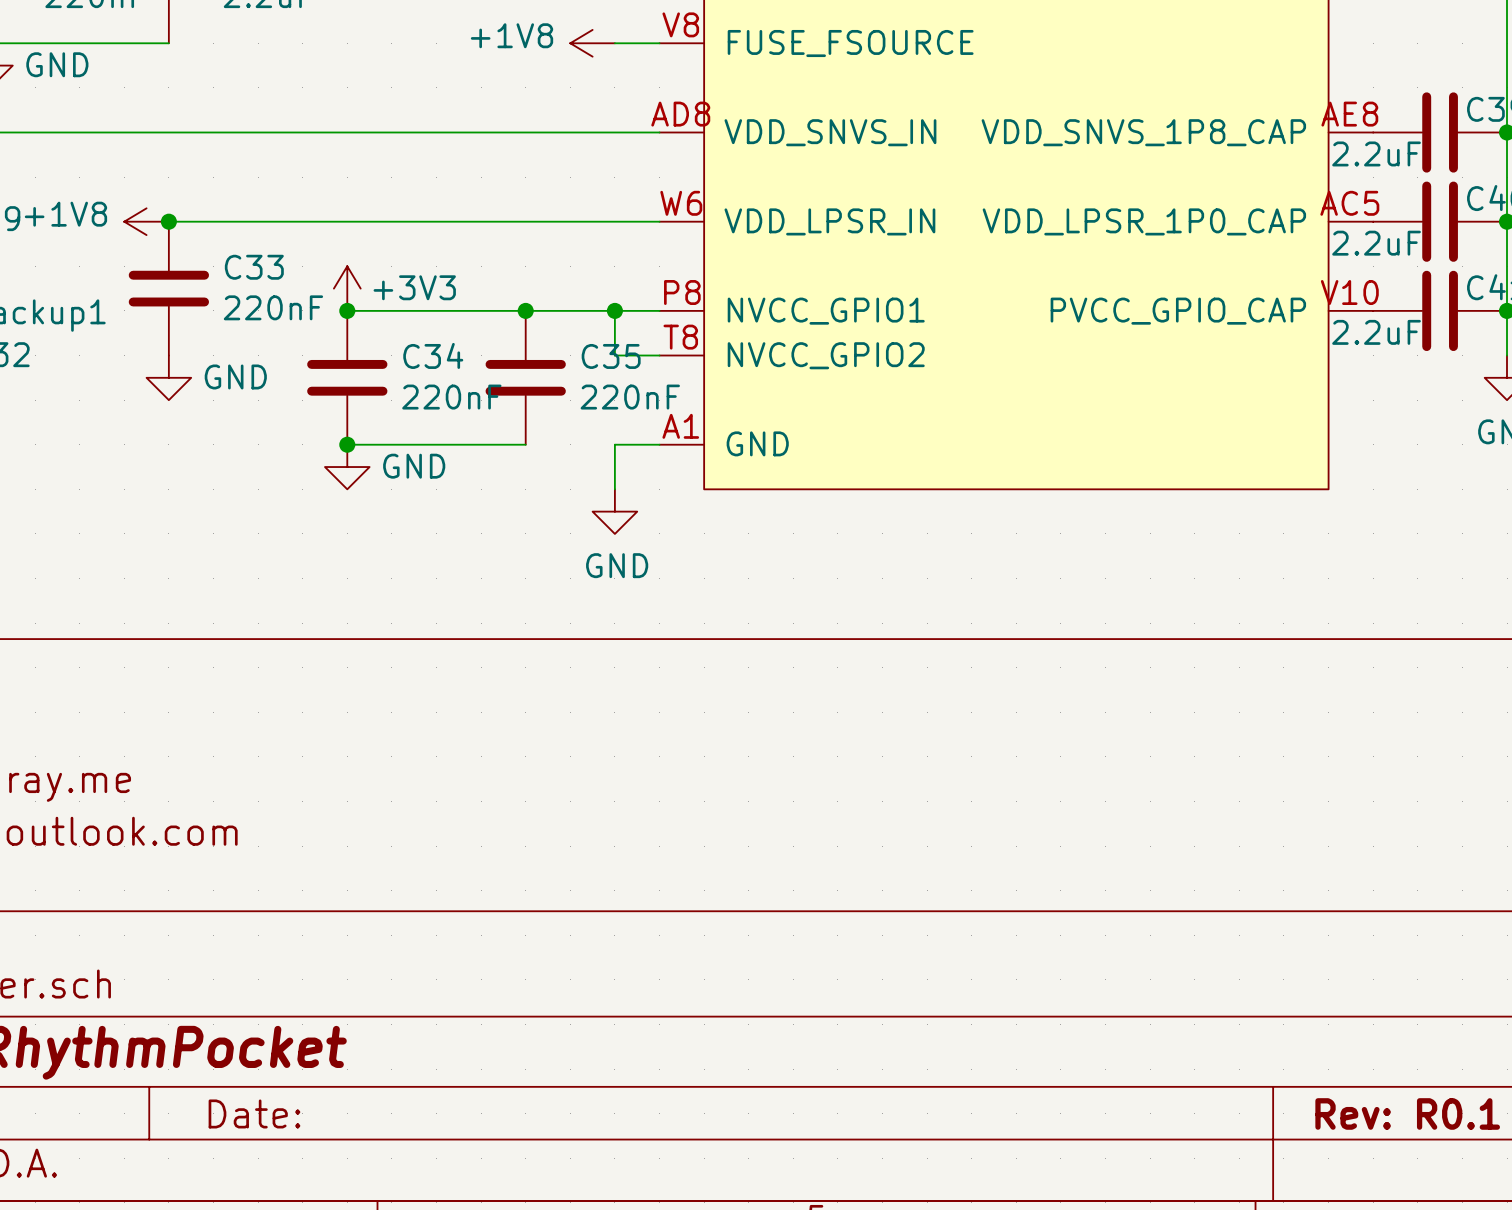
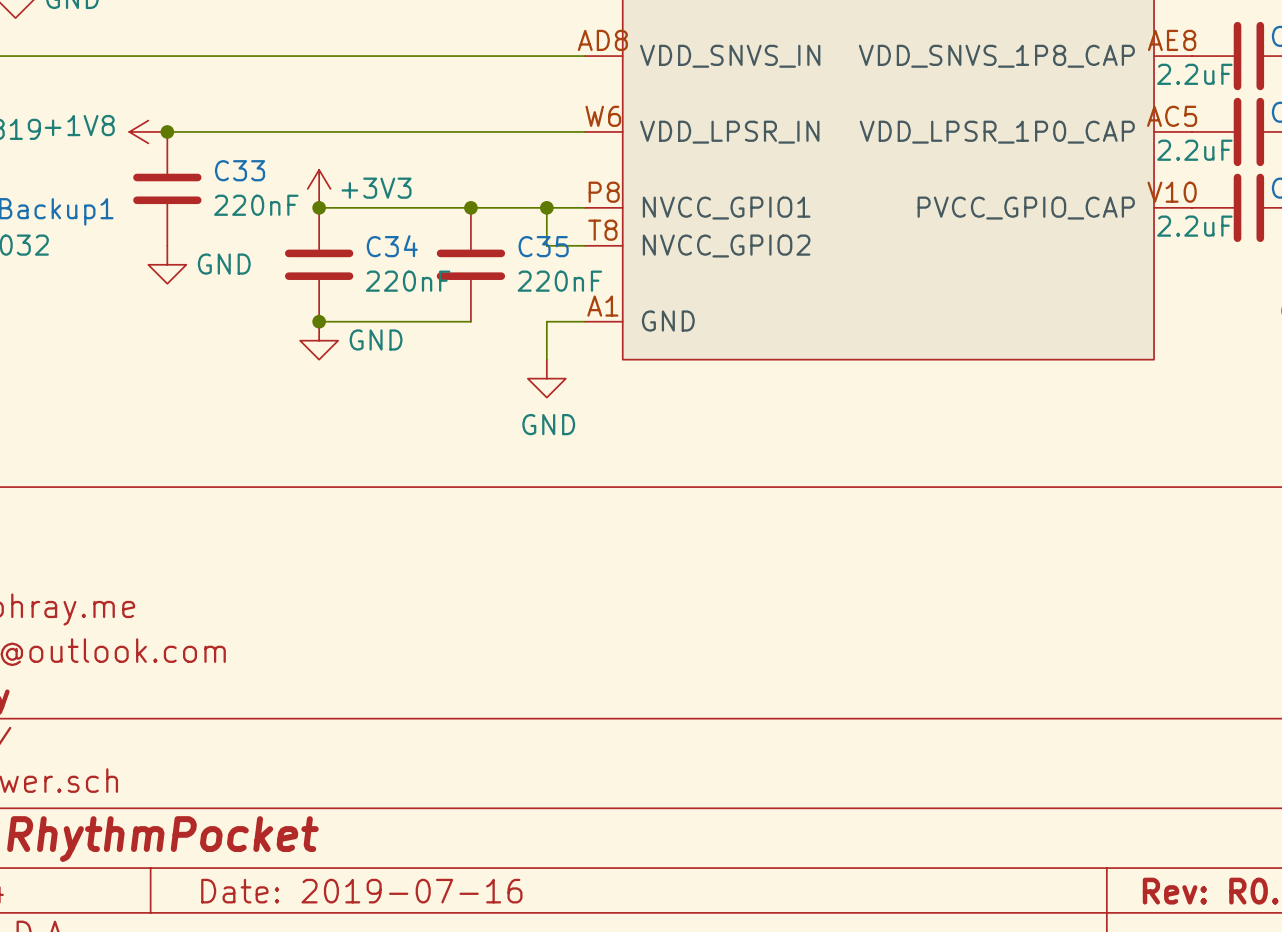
title block: Date: (254, 1113) -> Date: 2019-07-16 (361, 891)

